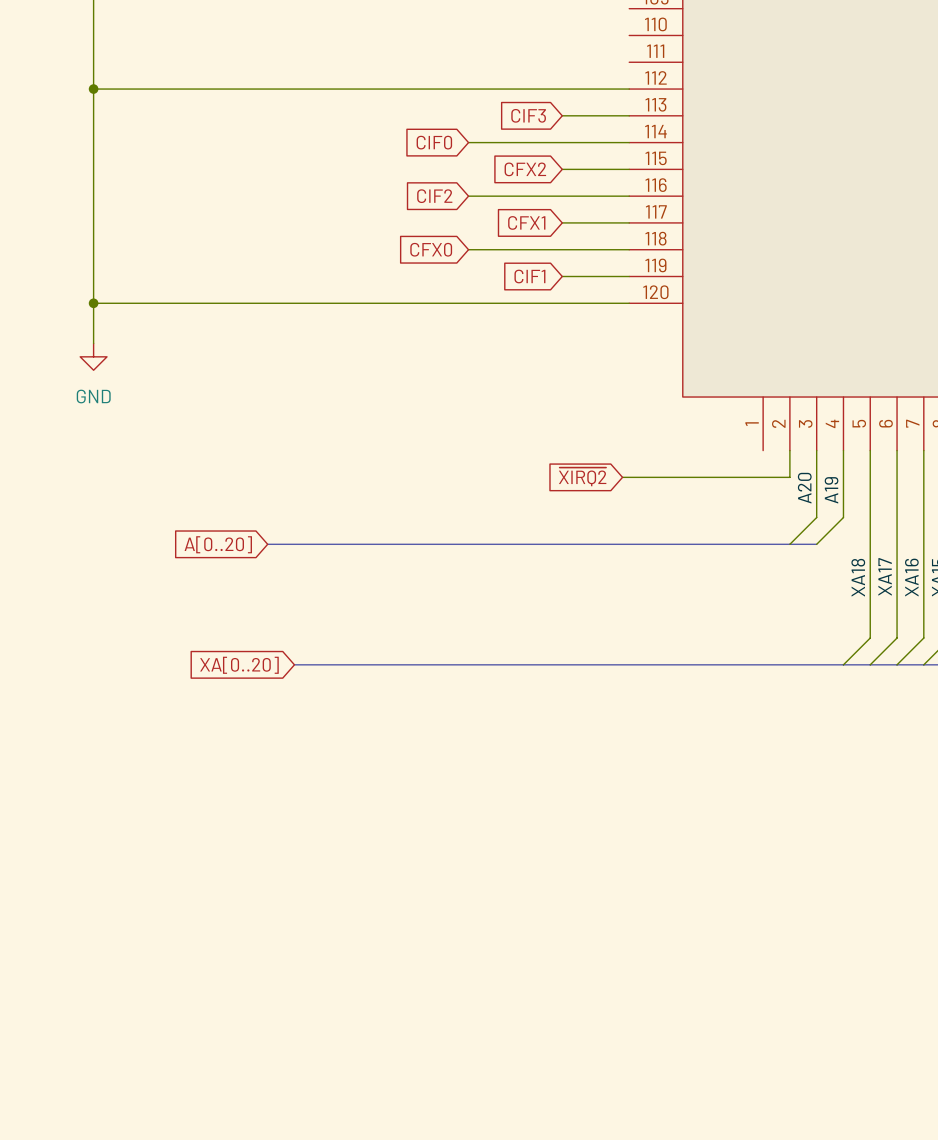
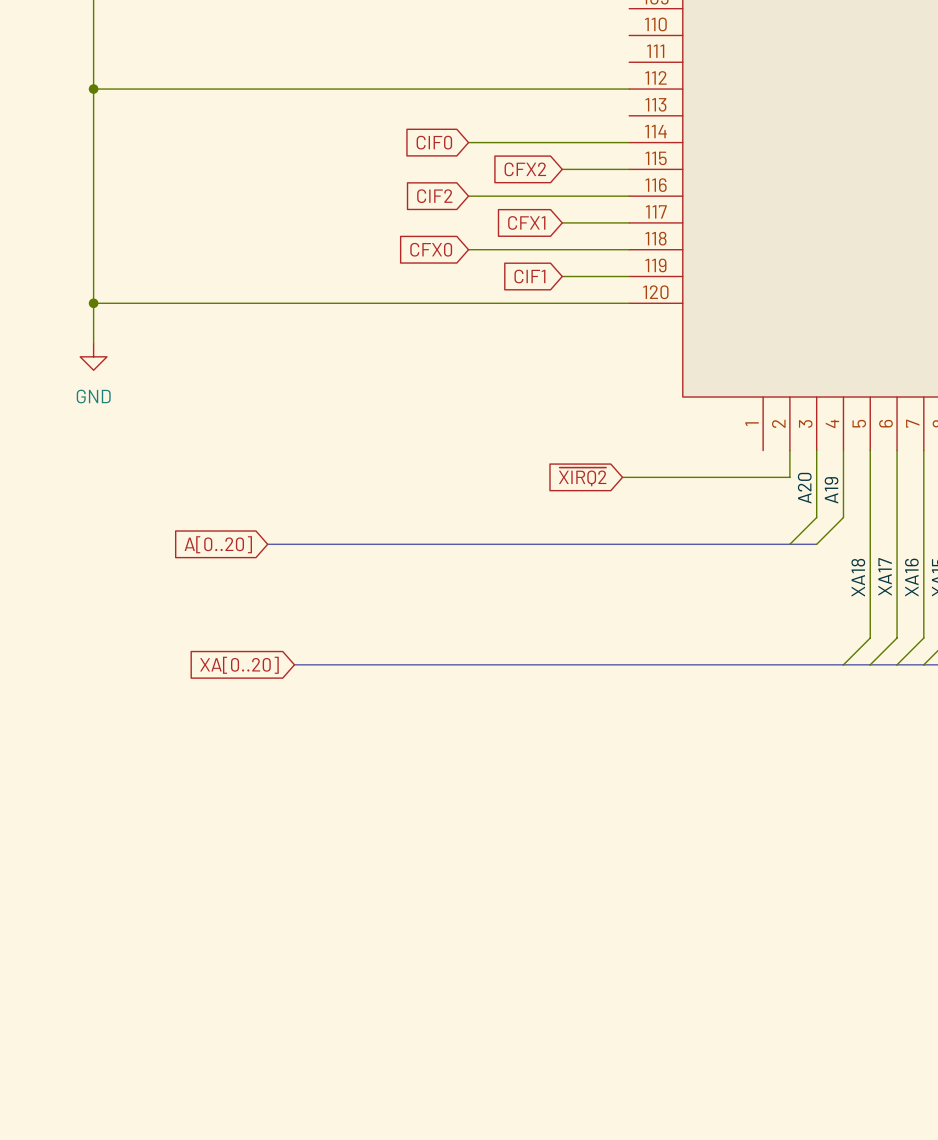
global label: CIF3 (528, 115) -> none
wire: (562, 115) (629, 115) -> none

